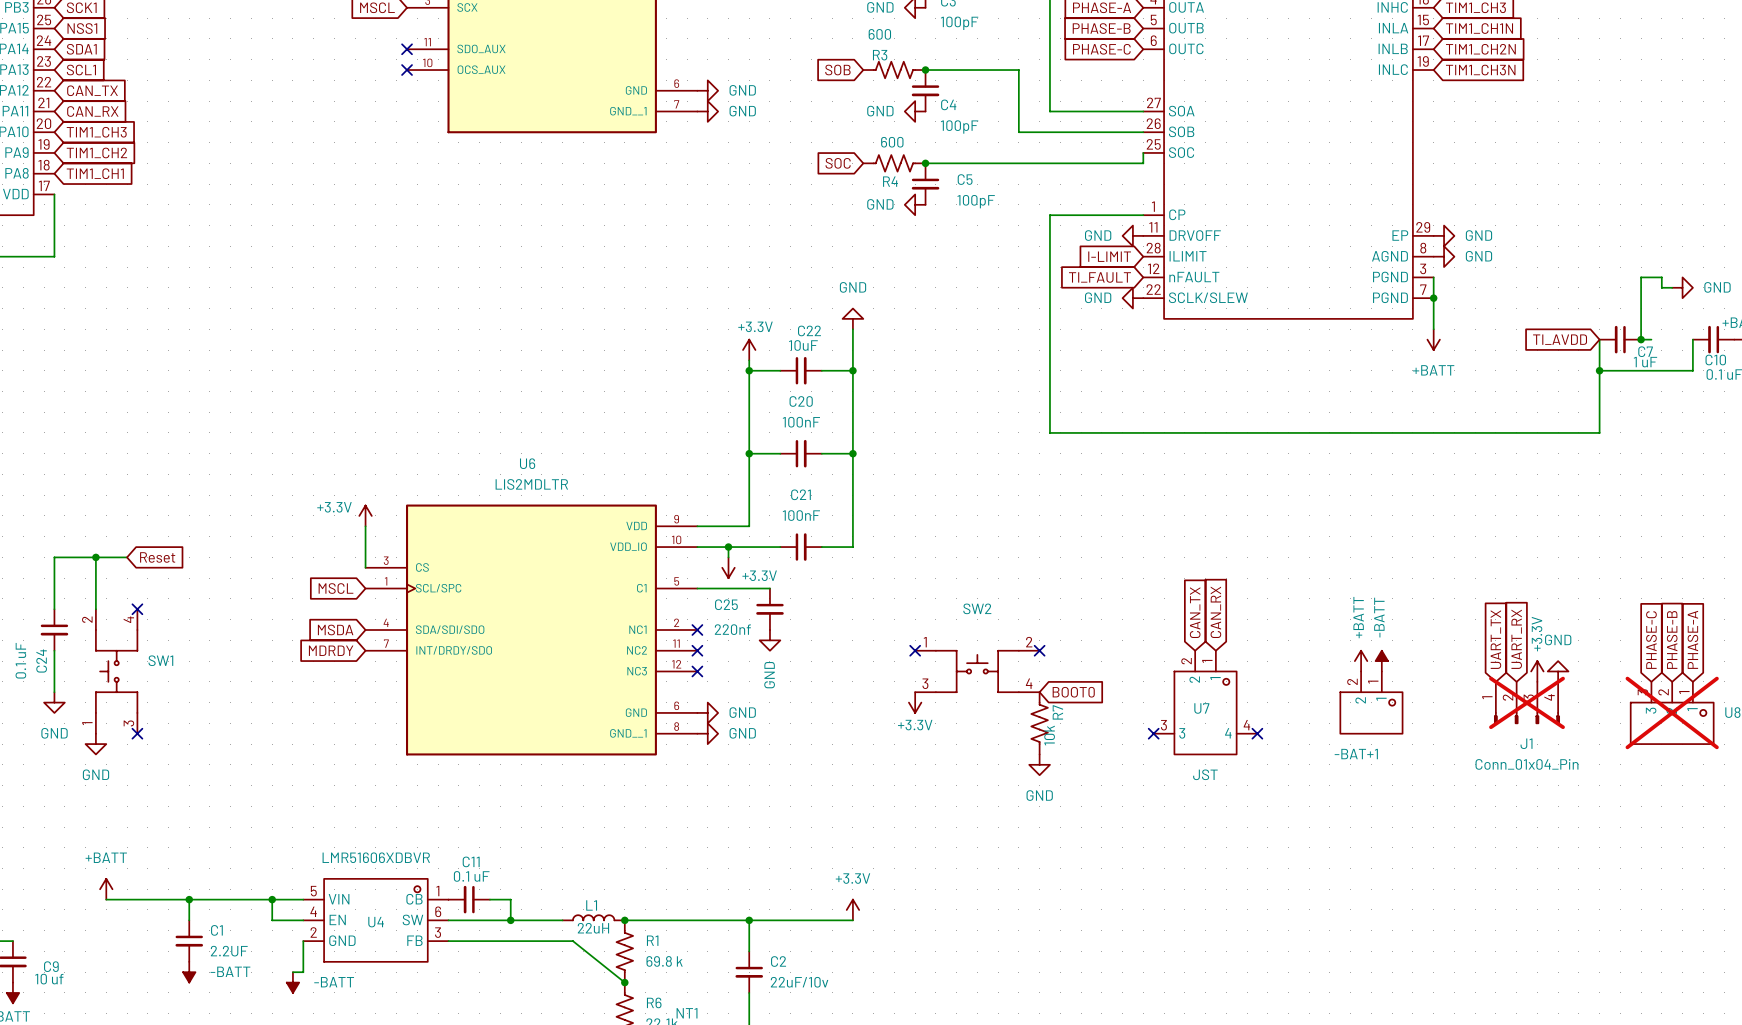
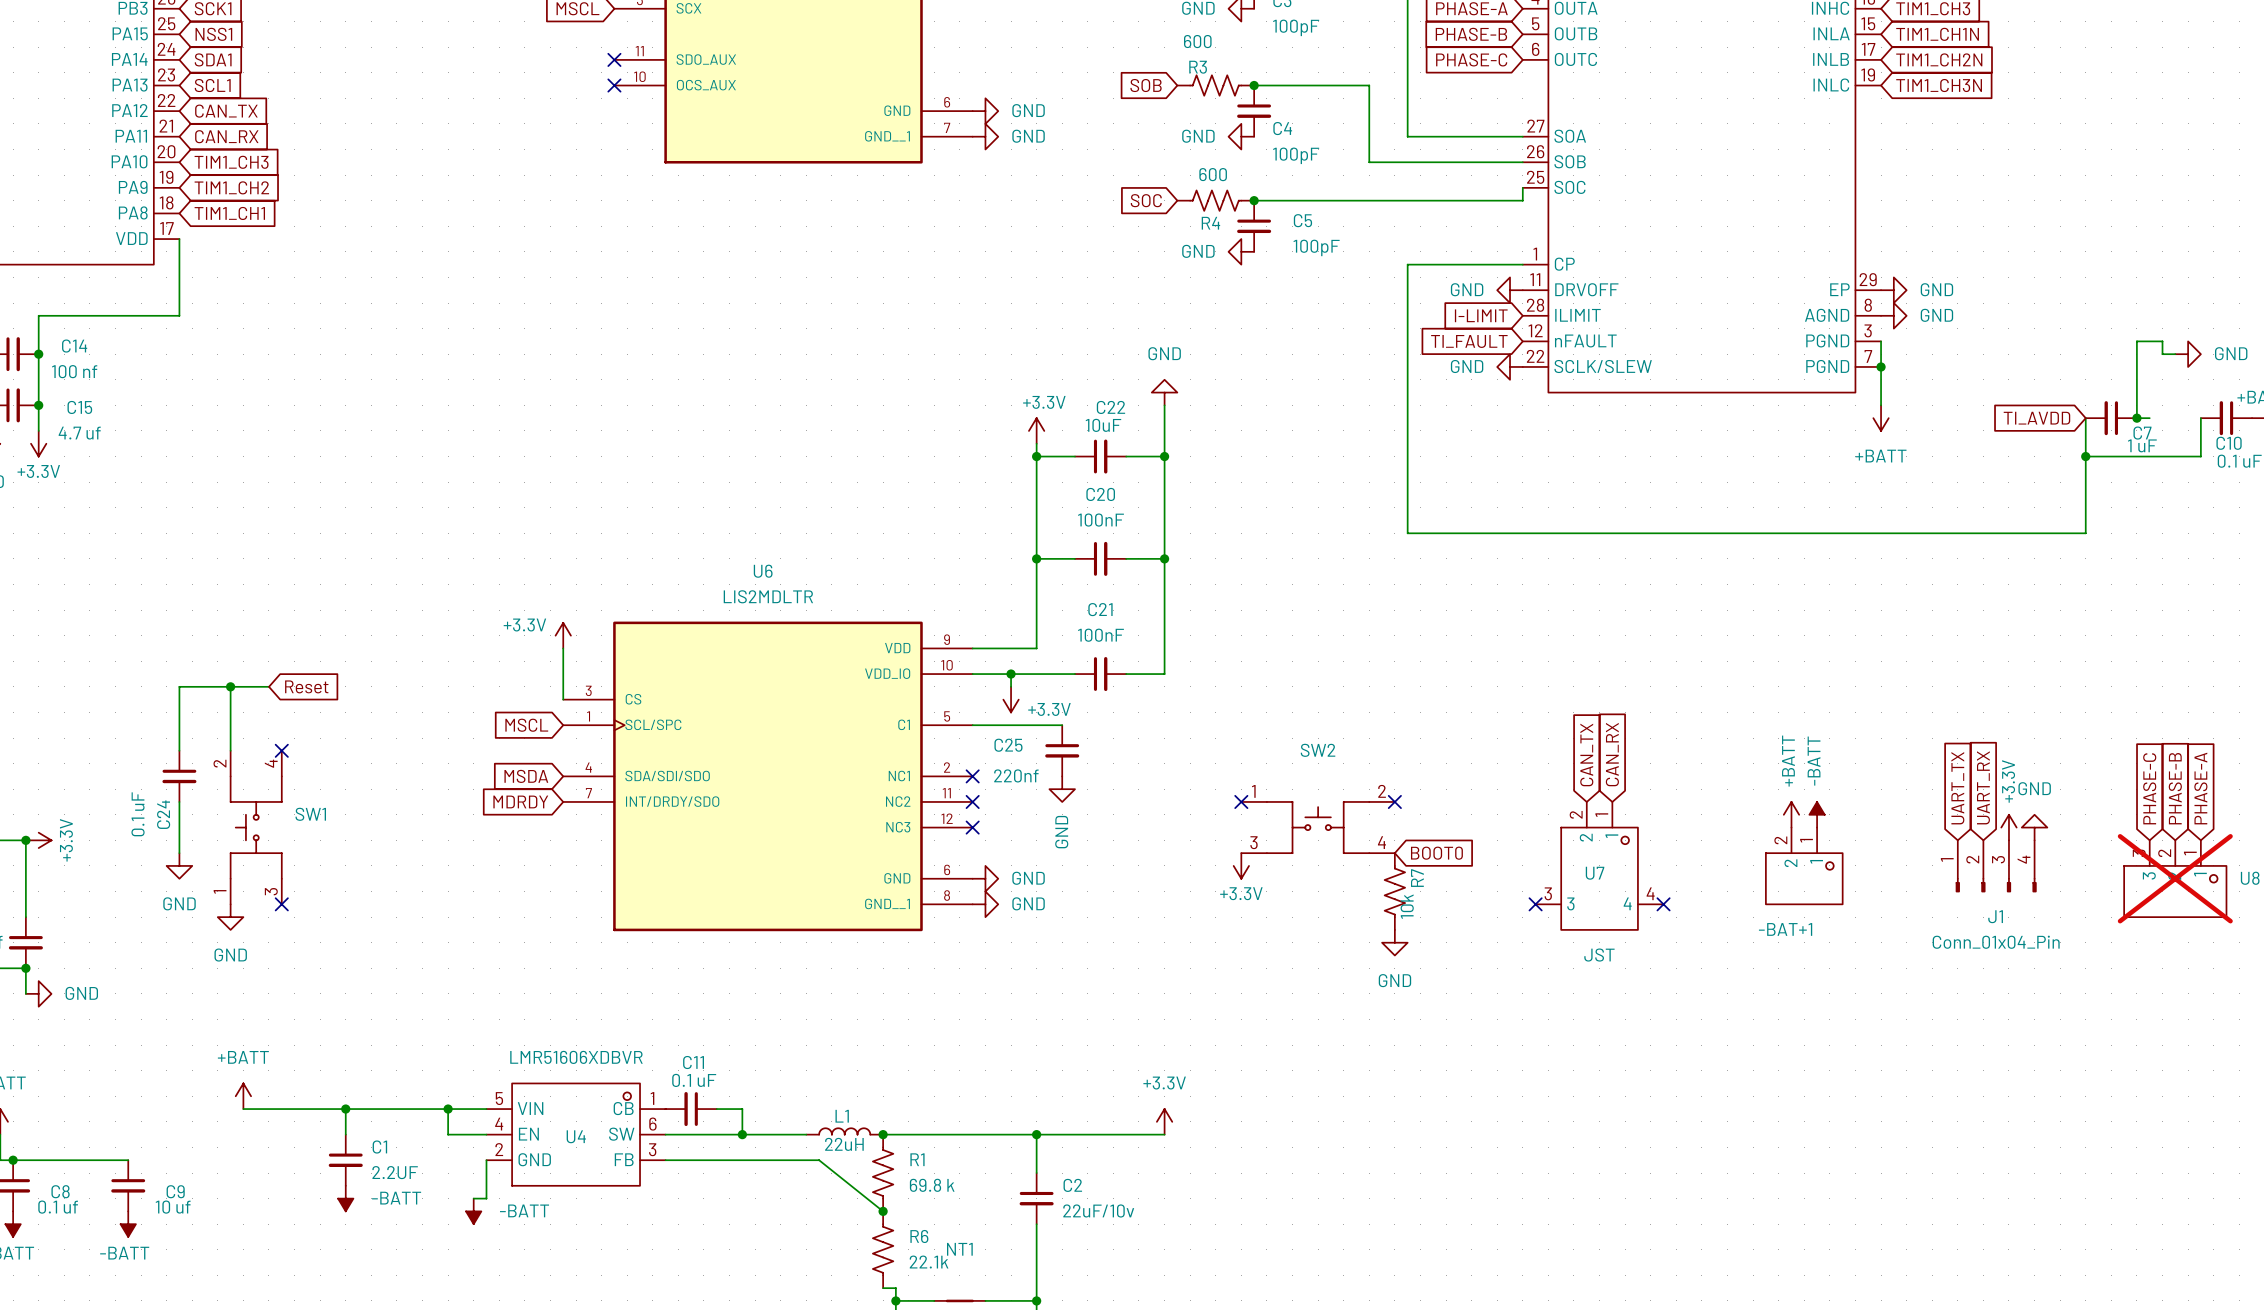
J1 do-not-place cross: (1527, 702) -> none

